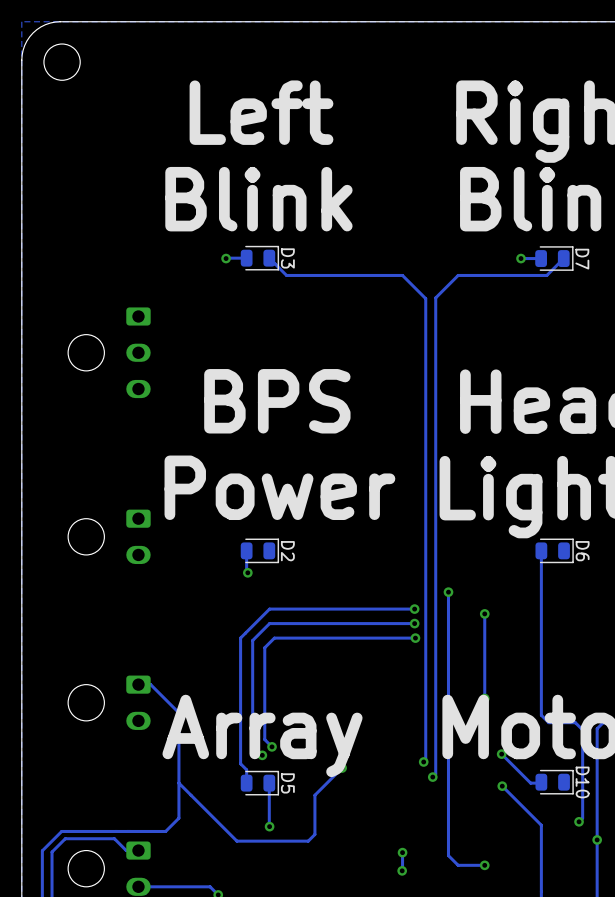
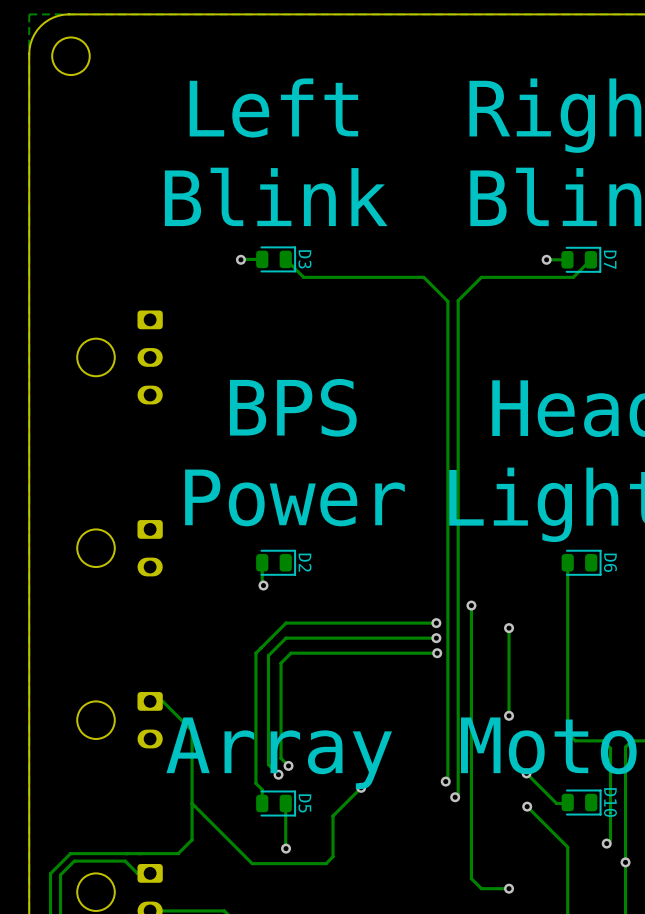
track: (402, 852) (402, 870) -> none
via: (402, 852) -> none
via: (402, 870) -> none

